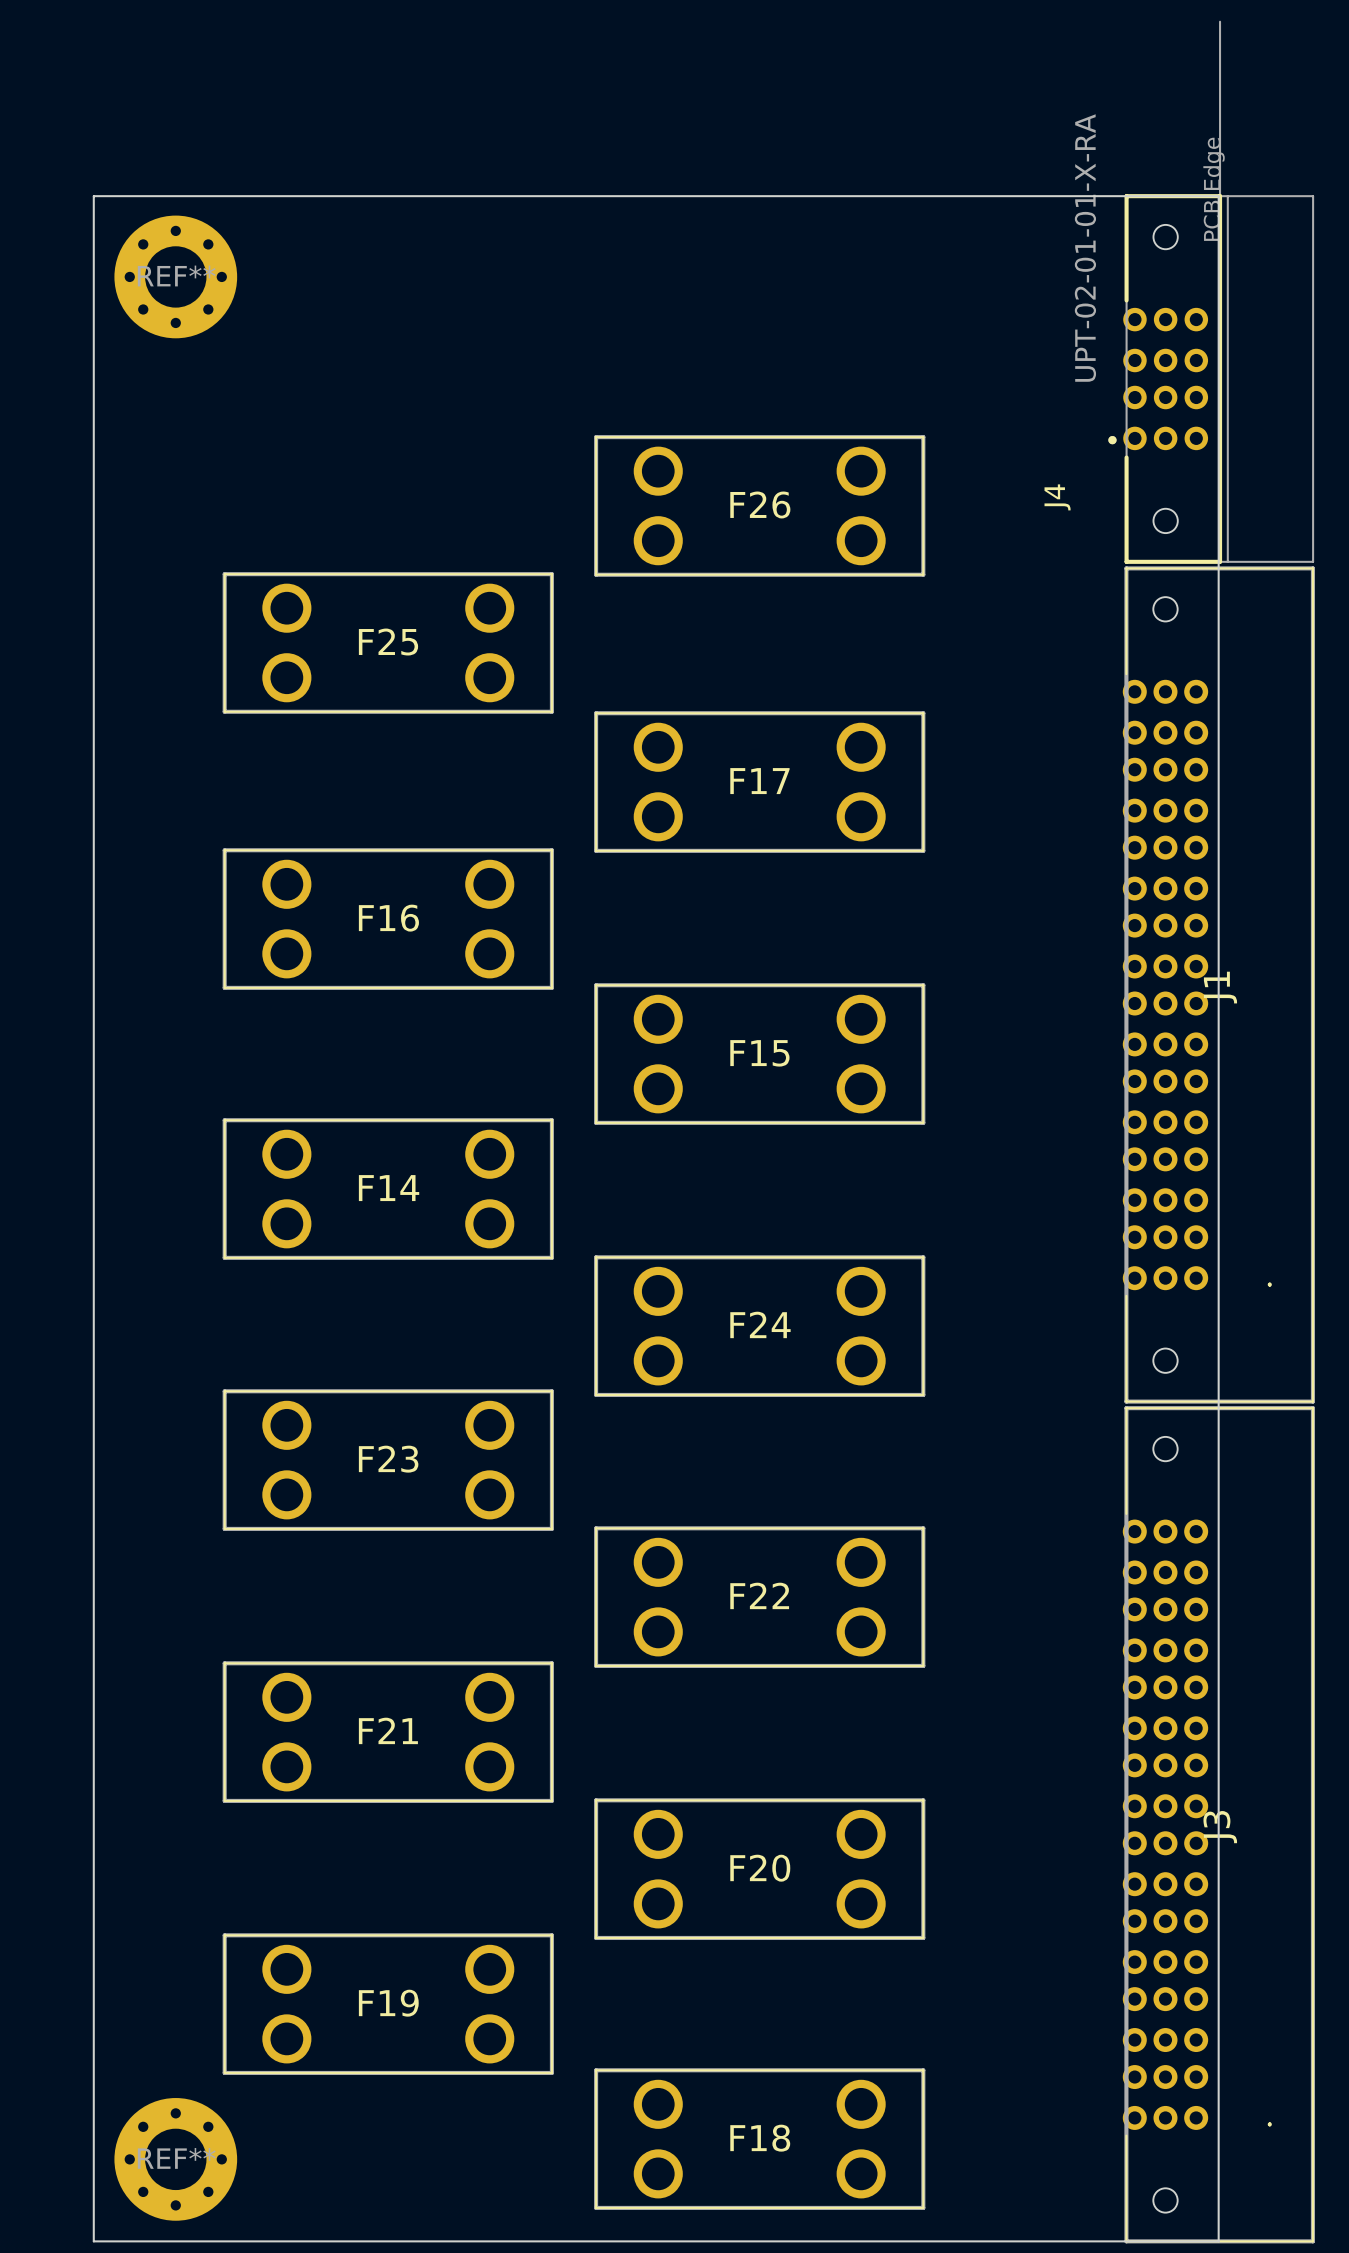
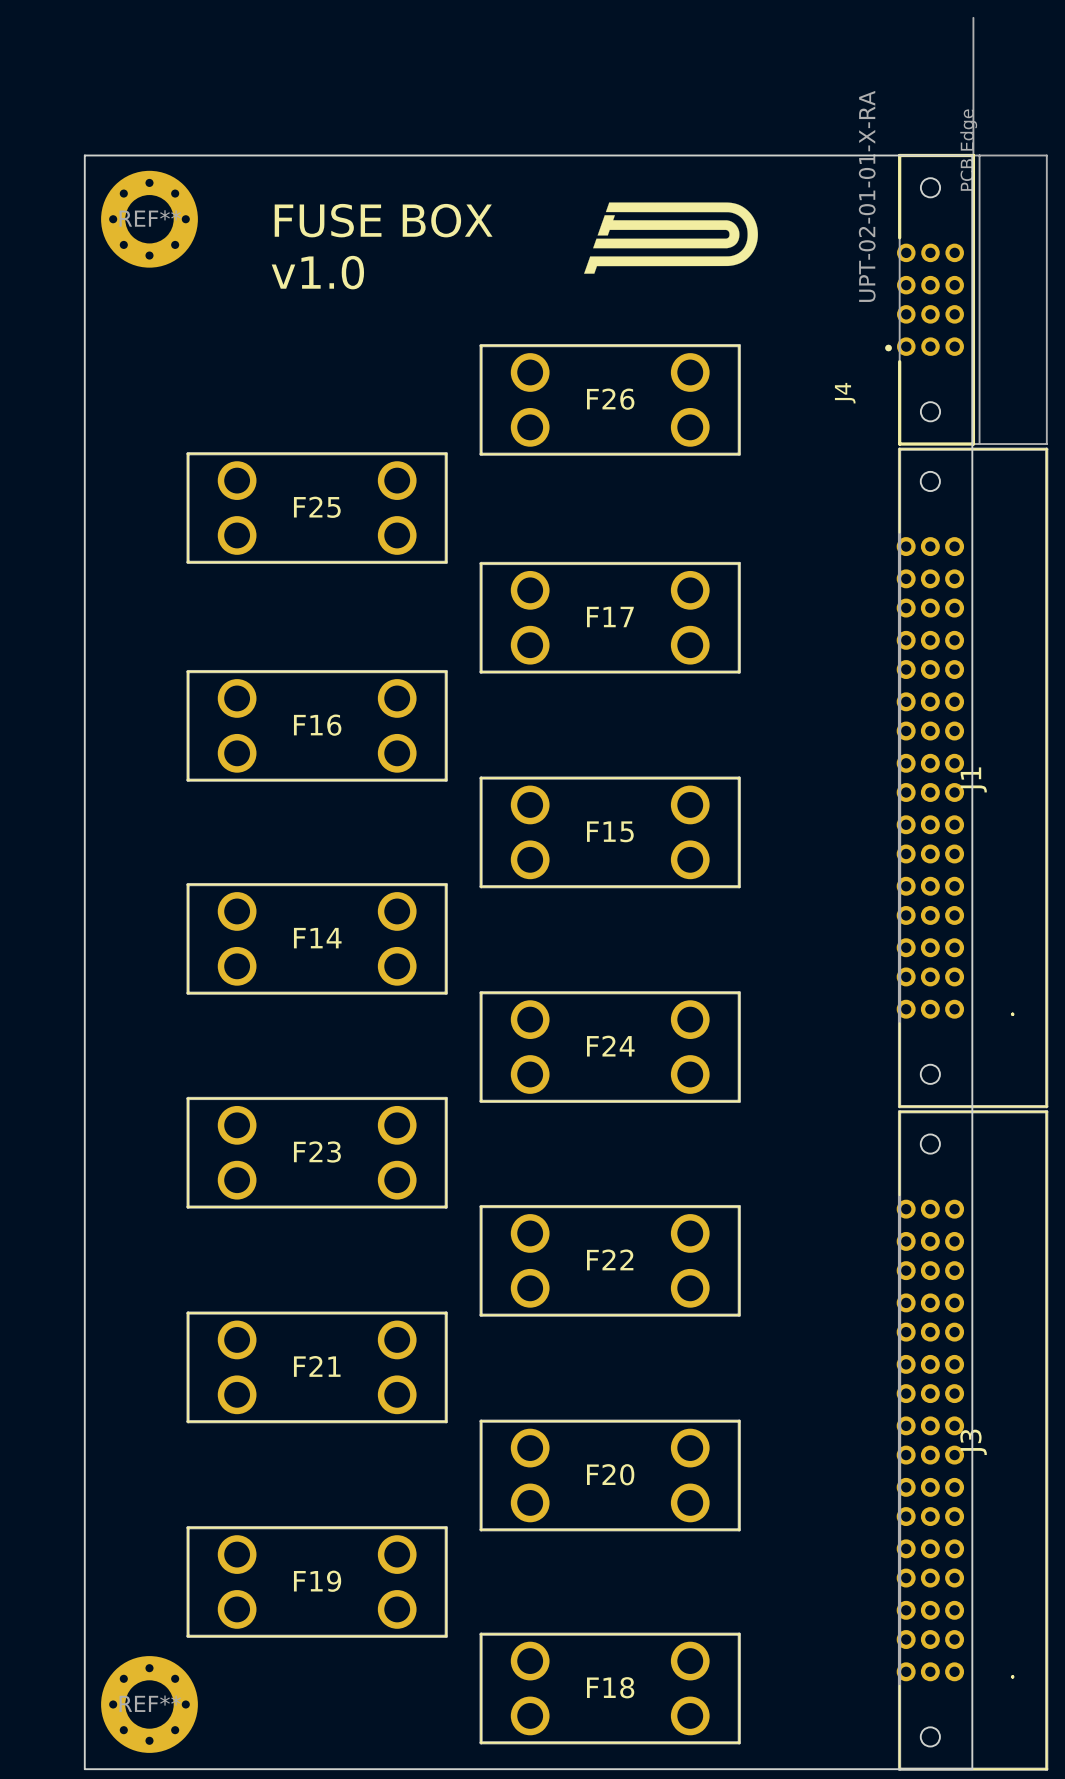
drawing: none -> [584, 202, 758, 274]
text: none -> FUSE BOX (383, 220)
text: none -> v1.0 (317, 272)

